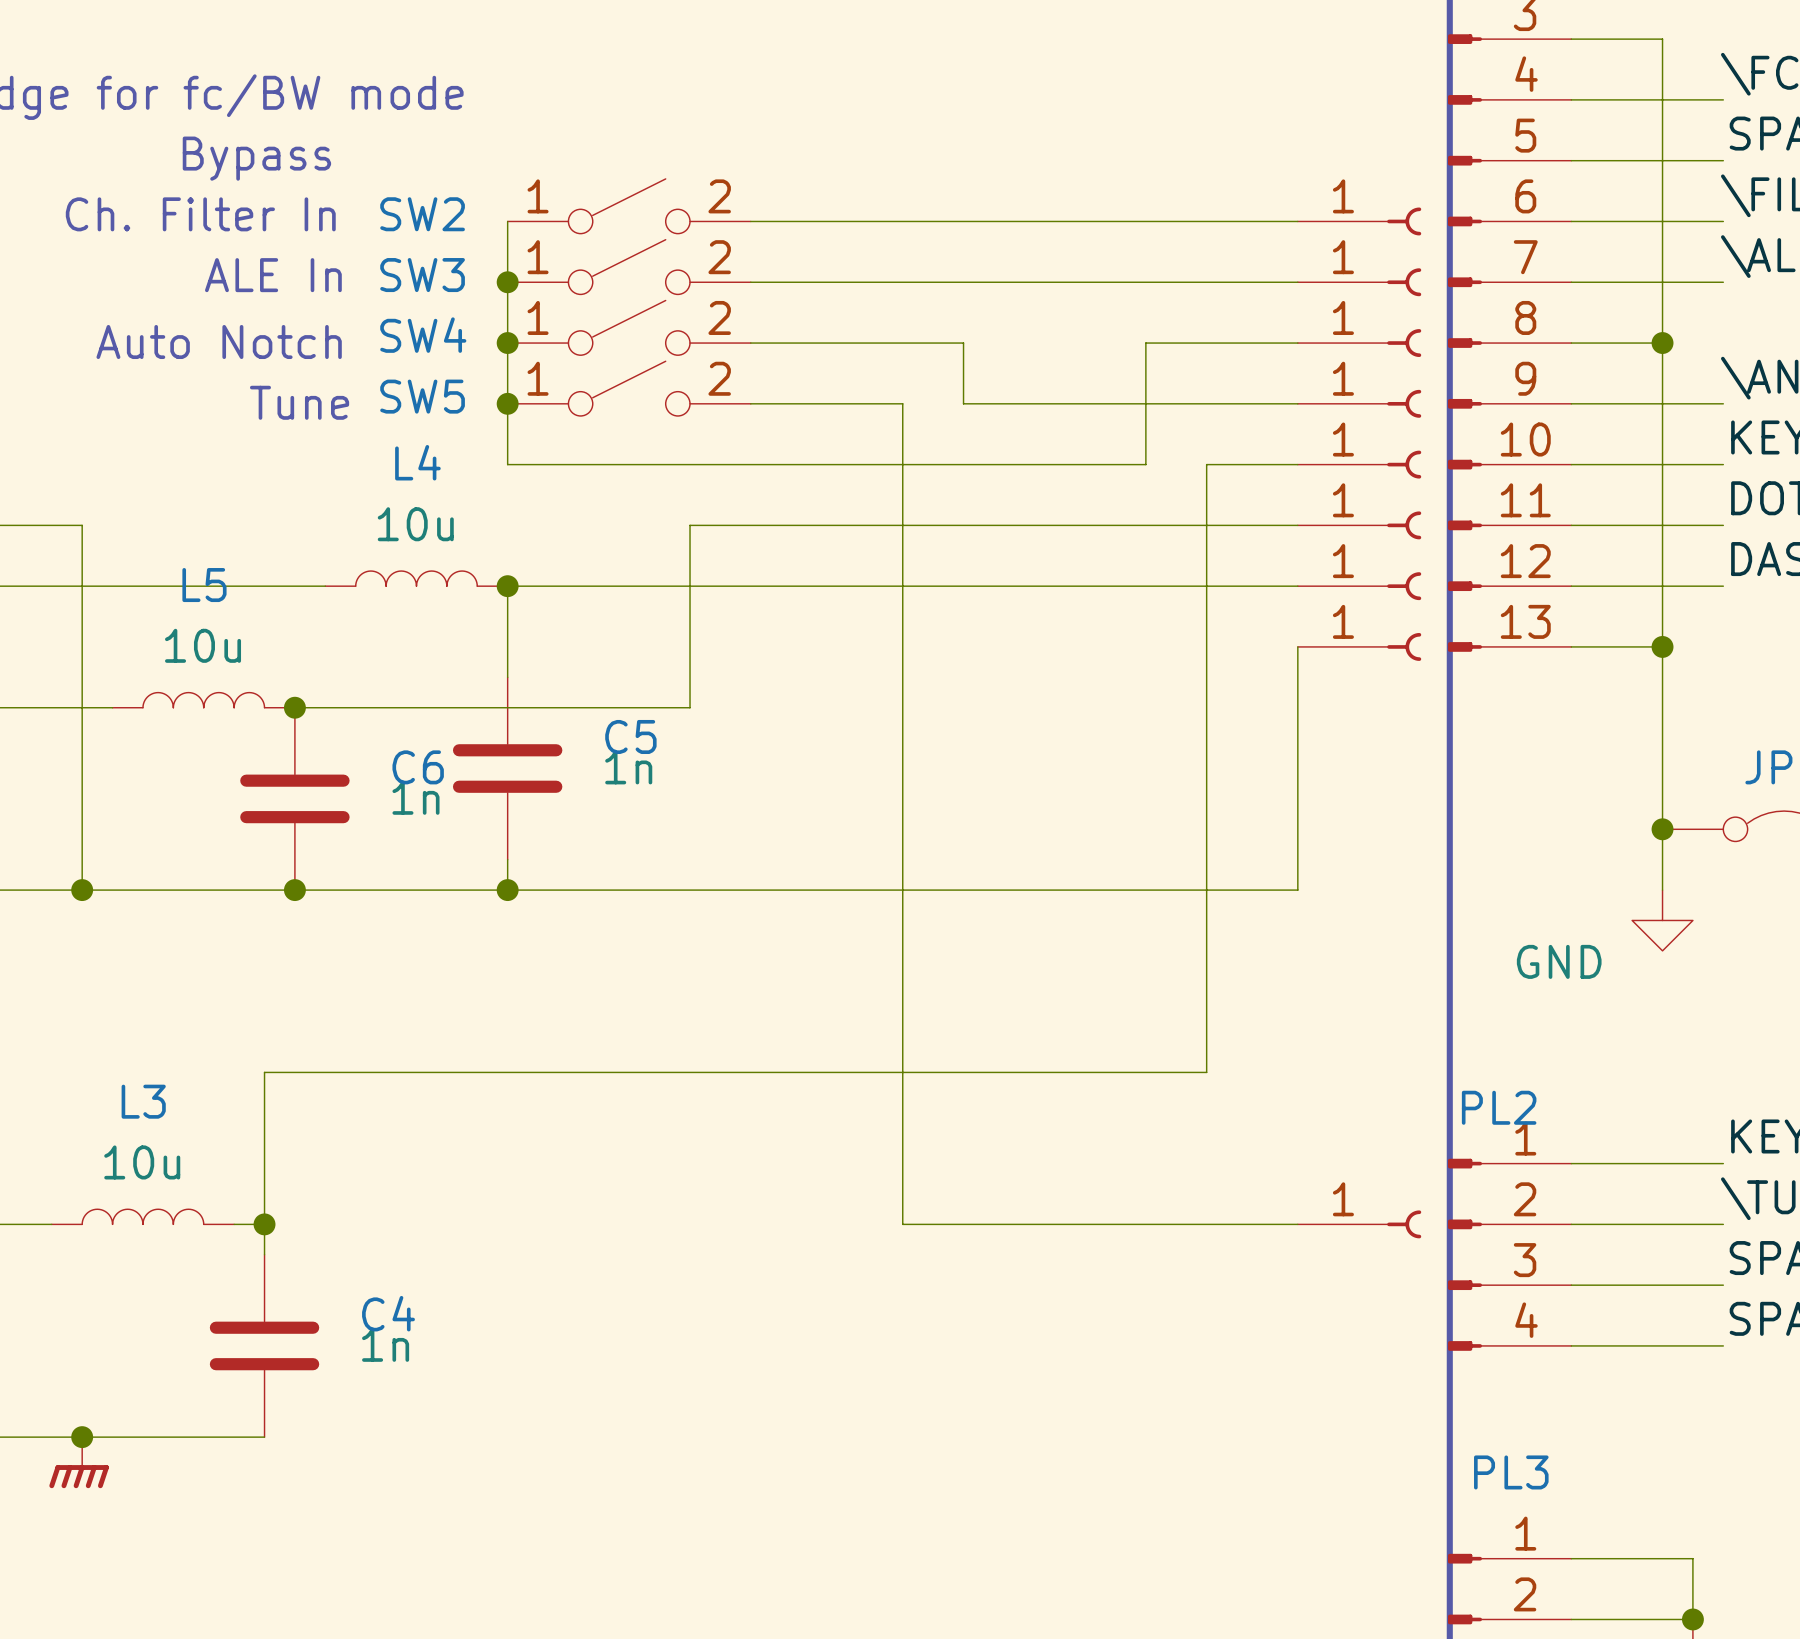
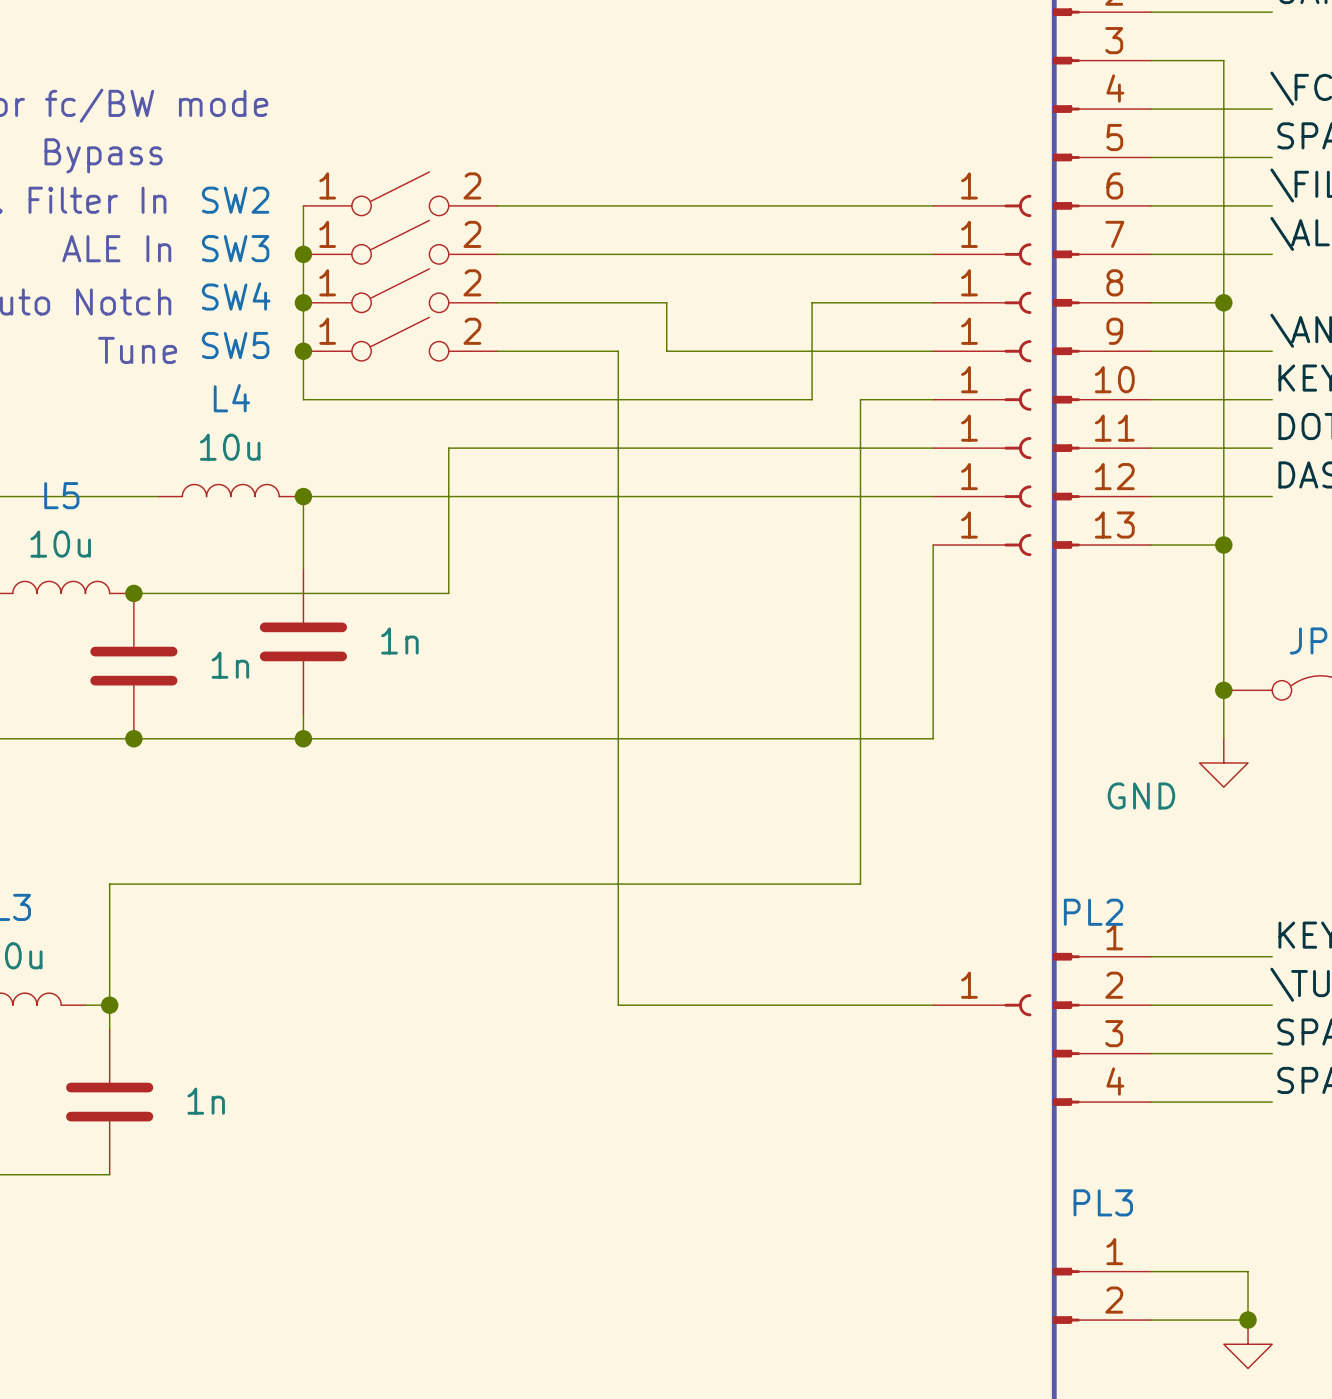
C5 name: C5 (630, 736) -> none
C6 name: C6 (418, 767) -> none
C4 name: C4 (388, 1313) -> none

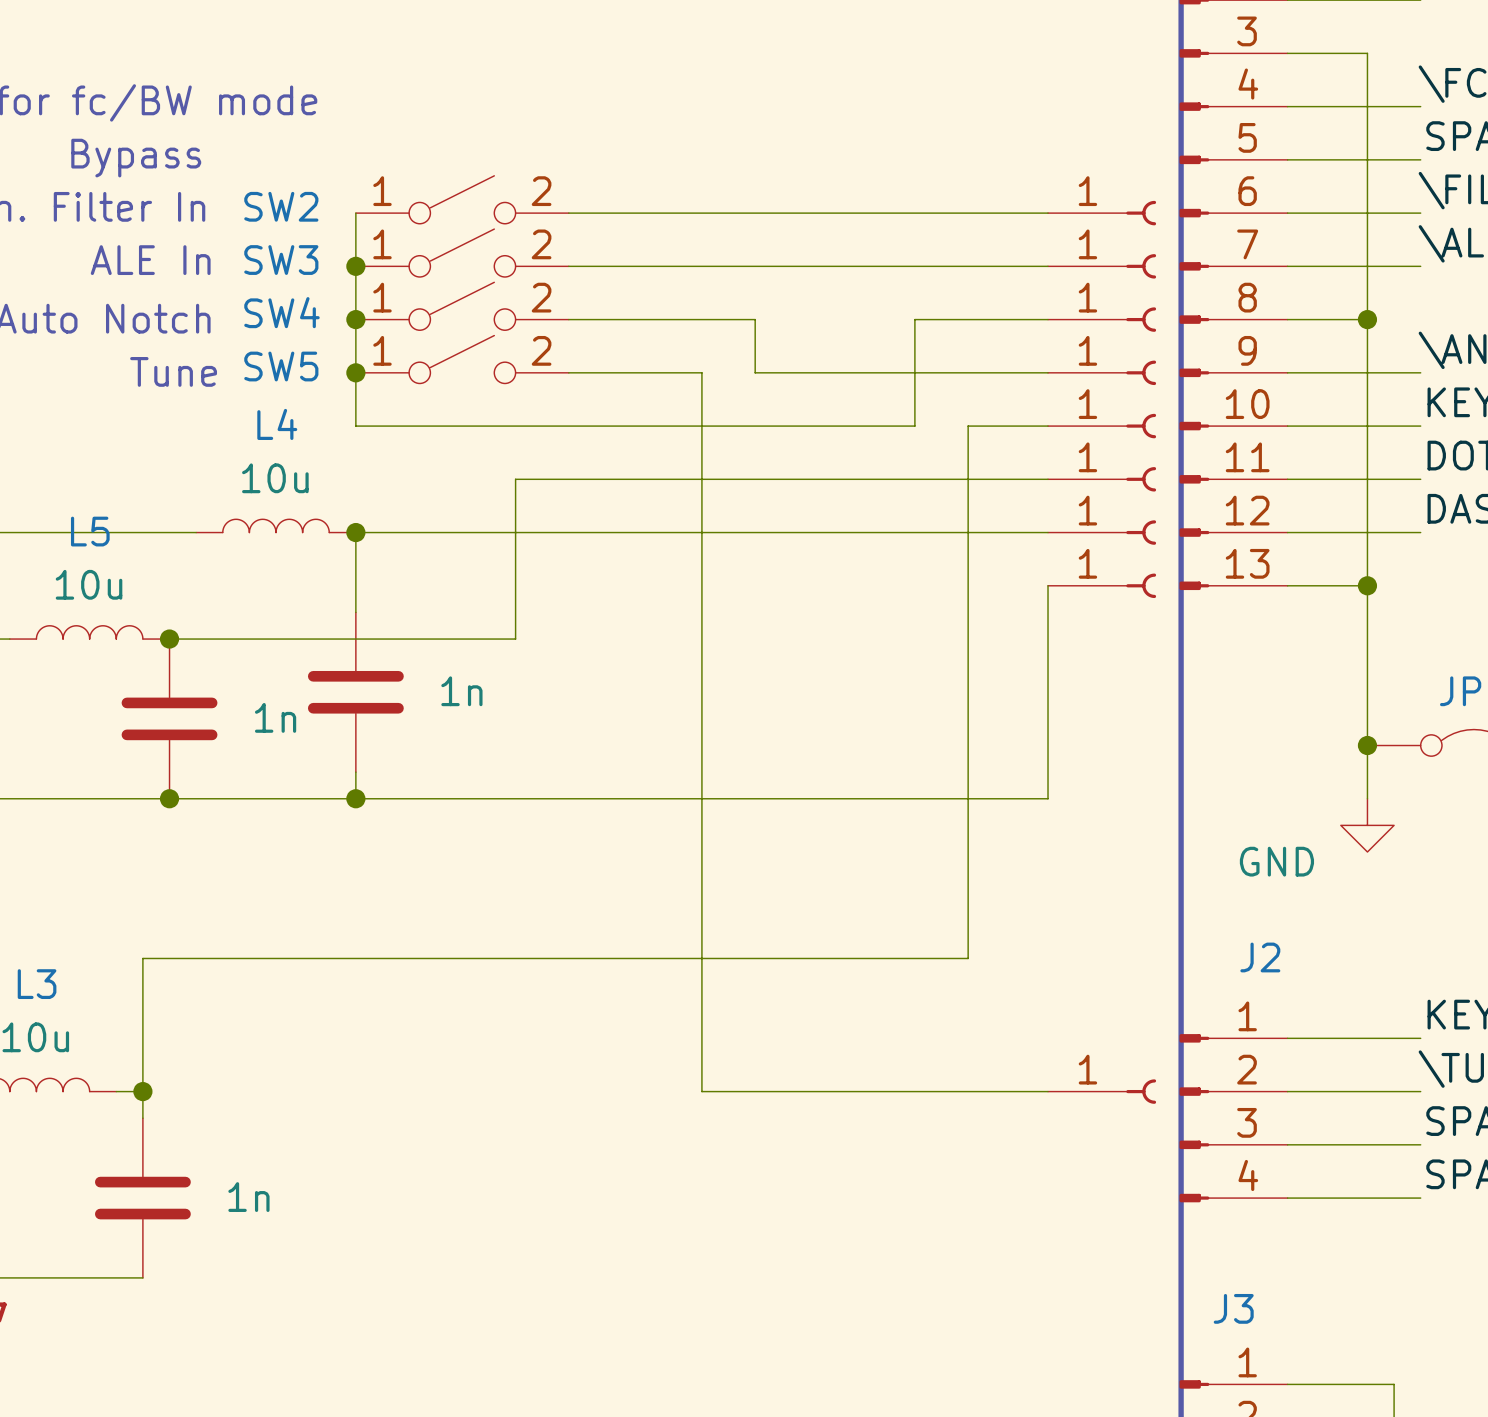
PL2 name: PL2 (1093, 912) -> J2 (1260, 957)
PL3 name: PL3 (1103, 1202) -> J3 (1233, 1308)

